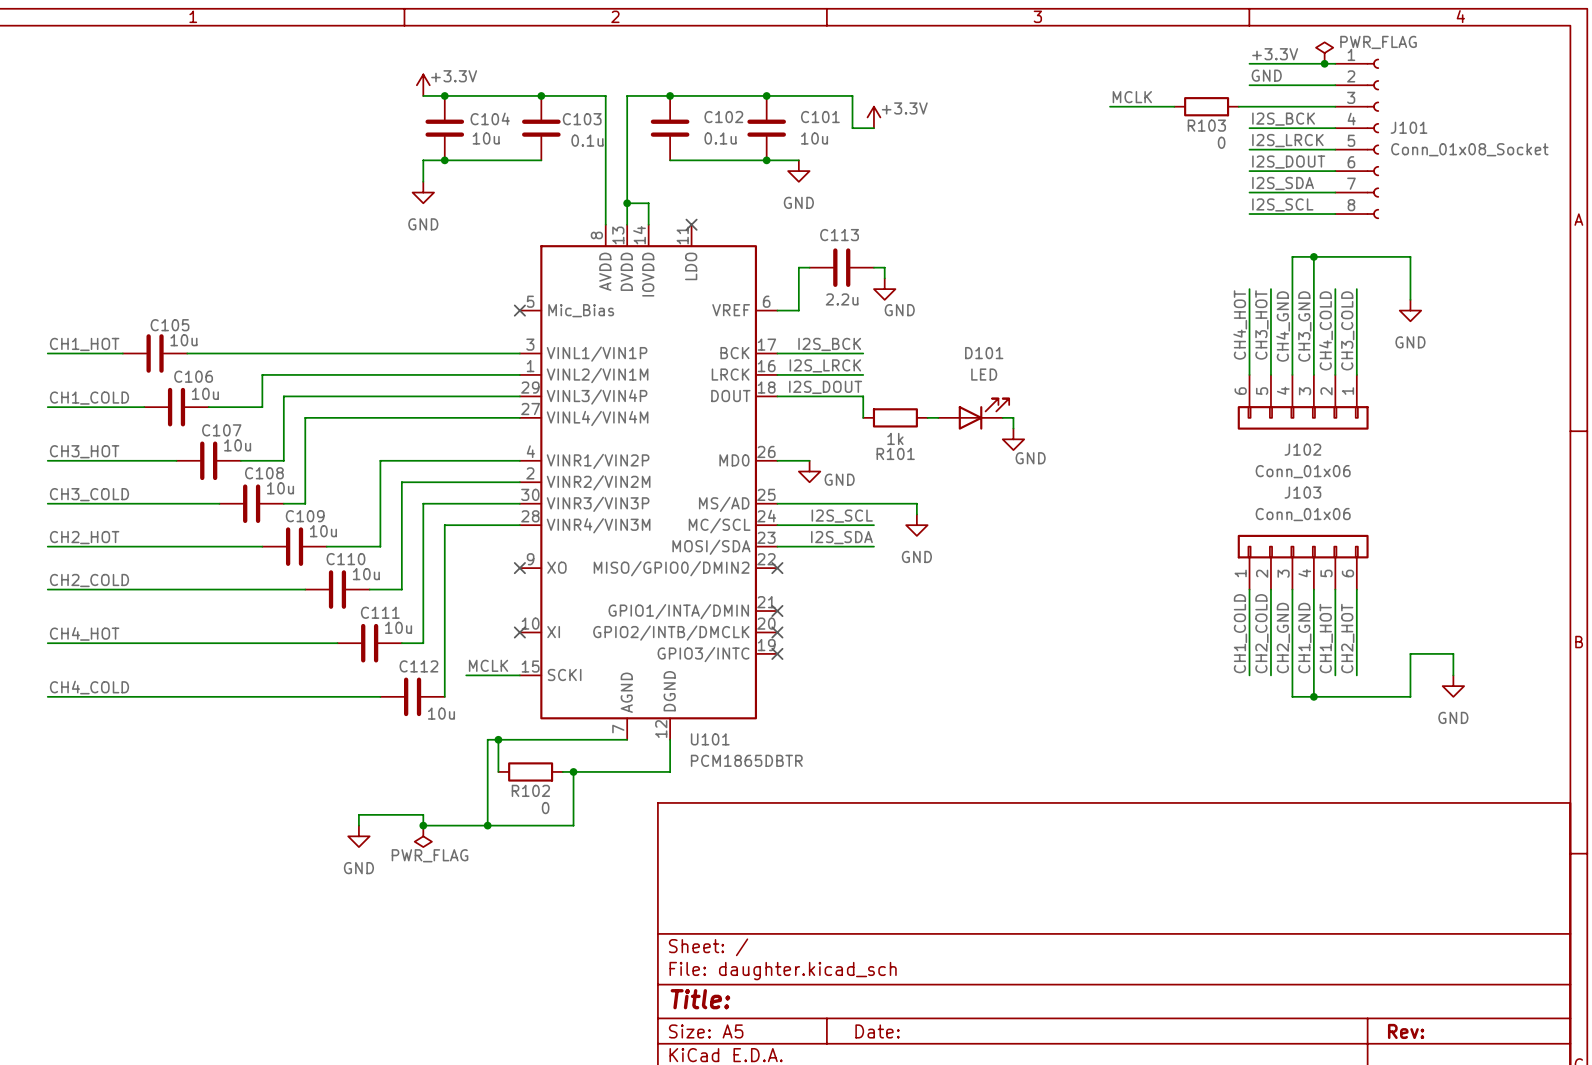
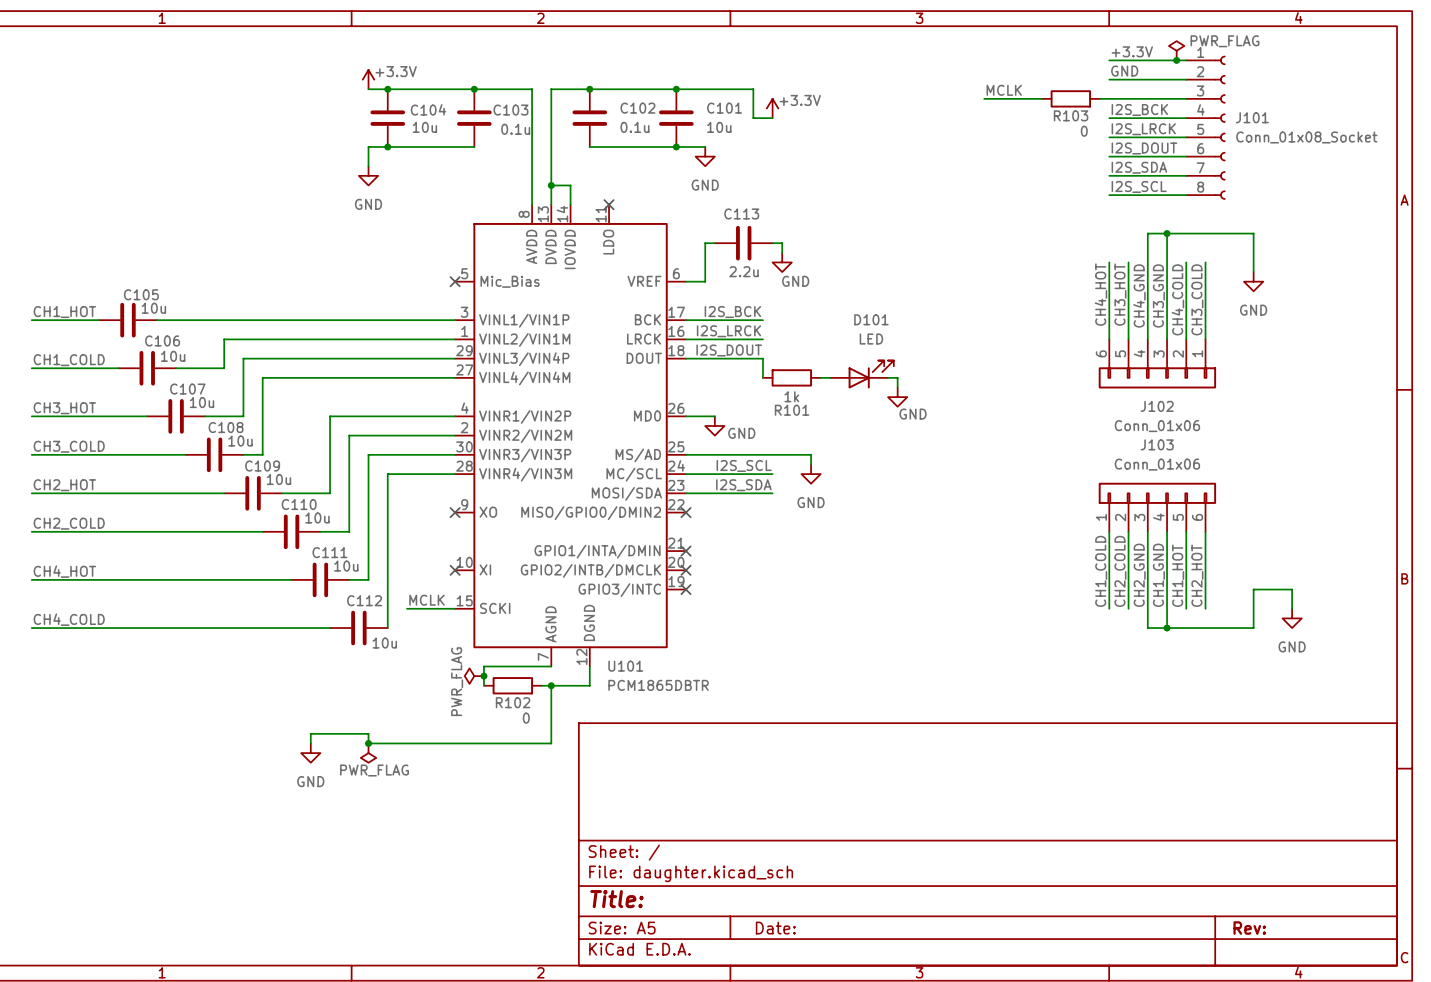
wire: (498, 739) (498, 771) -> none
junction: (498, 739) -> none
wire: (552, 739) (487, 739) (487, 825) -> (483, 666) (483, 685)
power symbol: none -> PWR_FLAG (474, 676)
junction: none -> (483, 676)
junction: none -> (551, 685)
wire: (670, 761) (670, 771) (562, 771) -> (589, 685) (541, 685)
R102 position: (530, 771) -> (512, 685)
wire: (573, 771) (573, 825) -> (551, 685) (551, 743) (503, 743)
junction: (573, 771) -> none
junction: (487, 825) -> none

